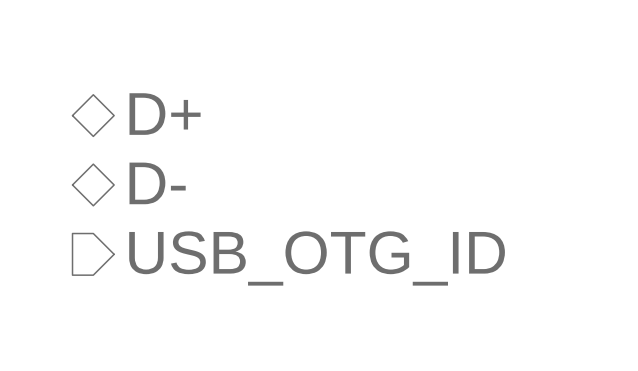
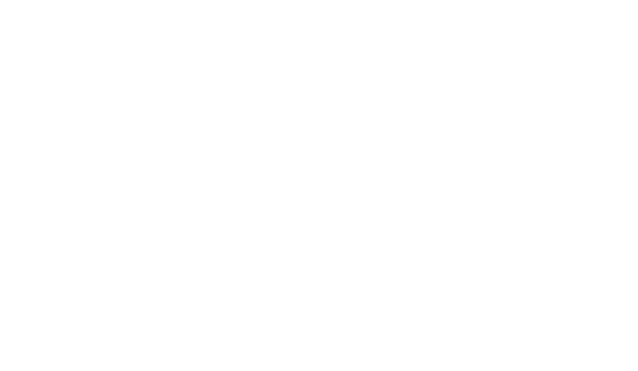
hierarchical label: D+ (165, 114) -> none
hierarchical label: D- (157, 183) -> none
hierarchical label: USB_OTG_ID (317, 258) -> none

